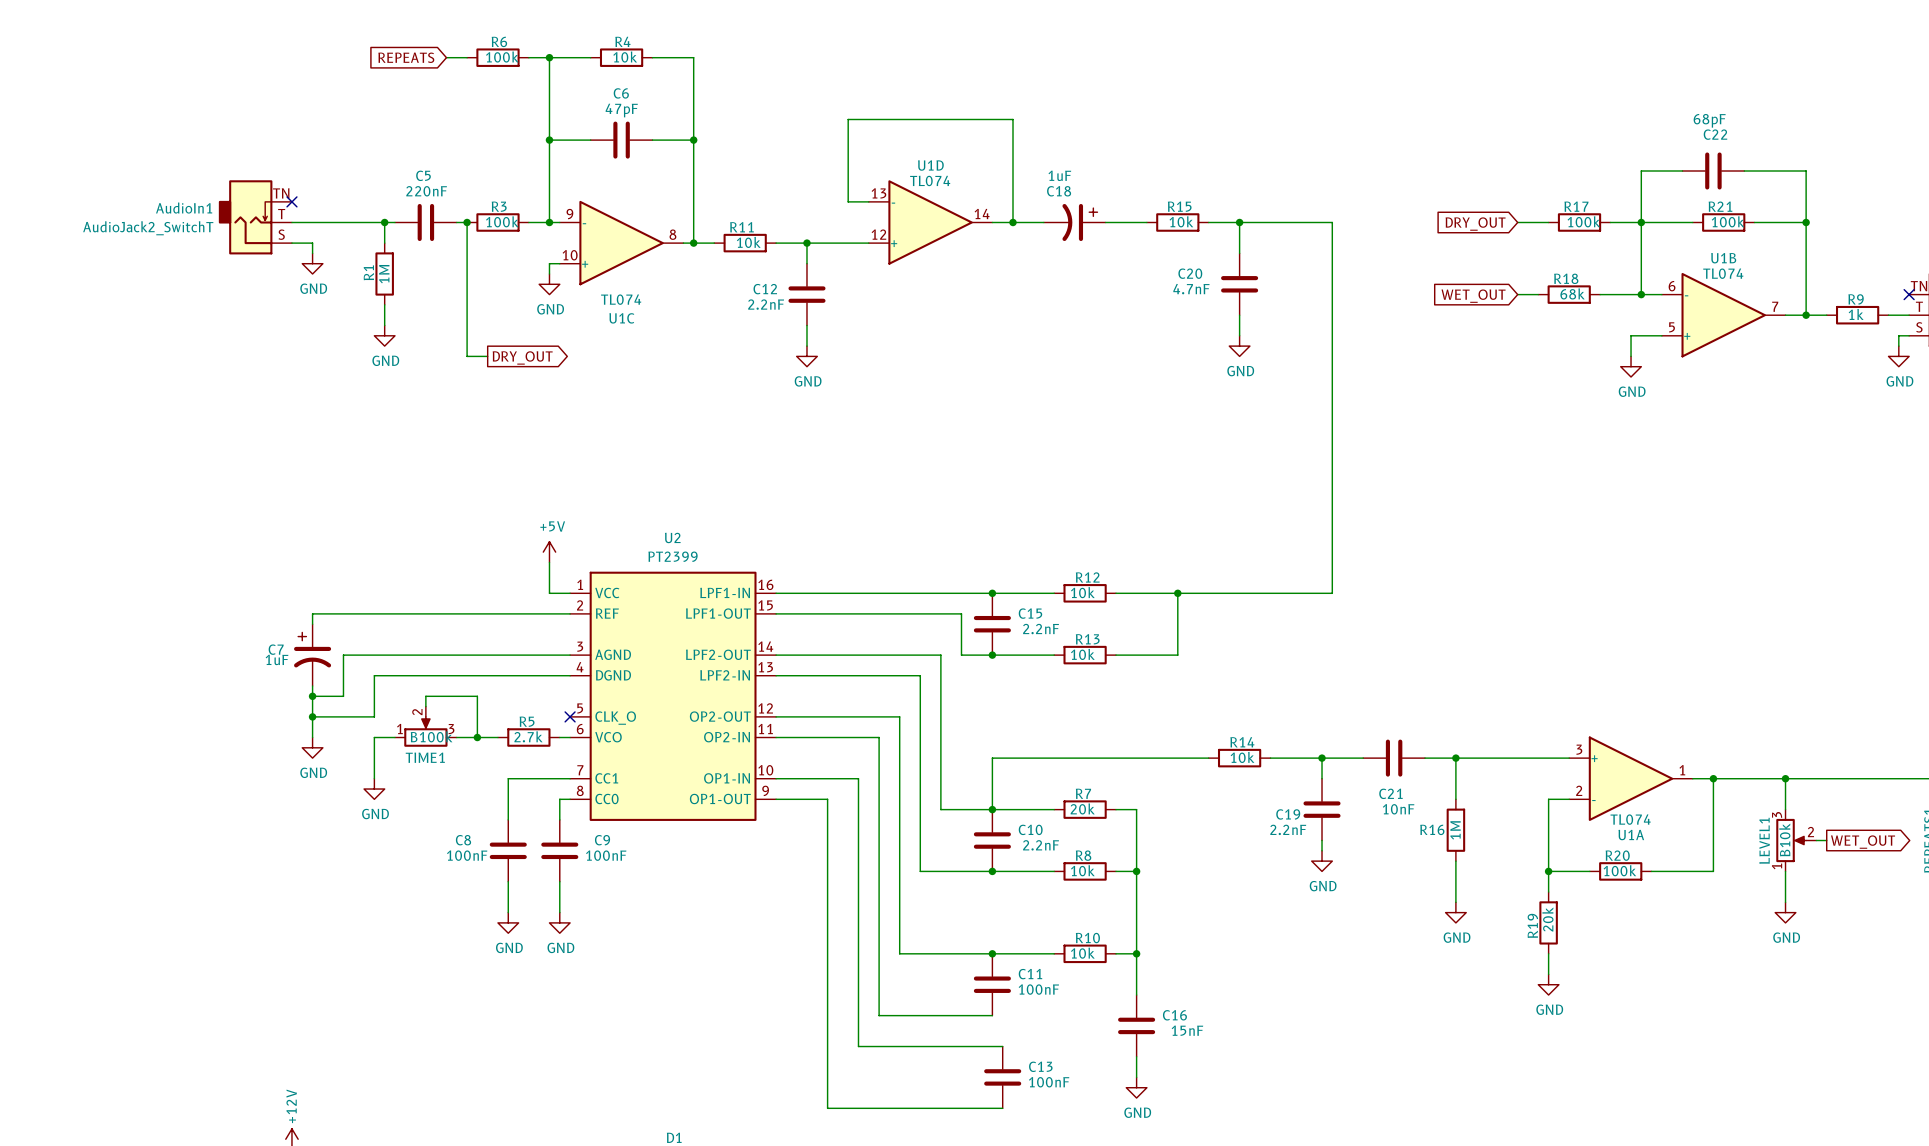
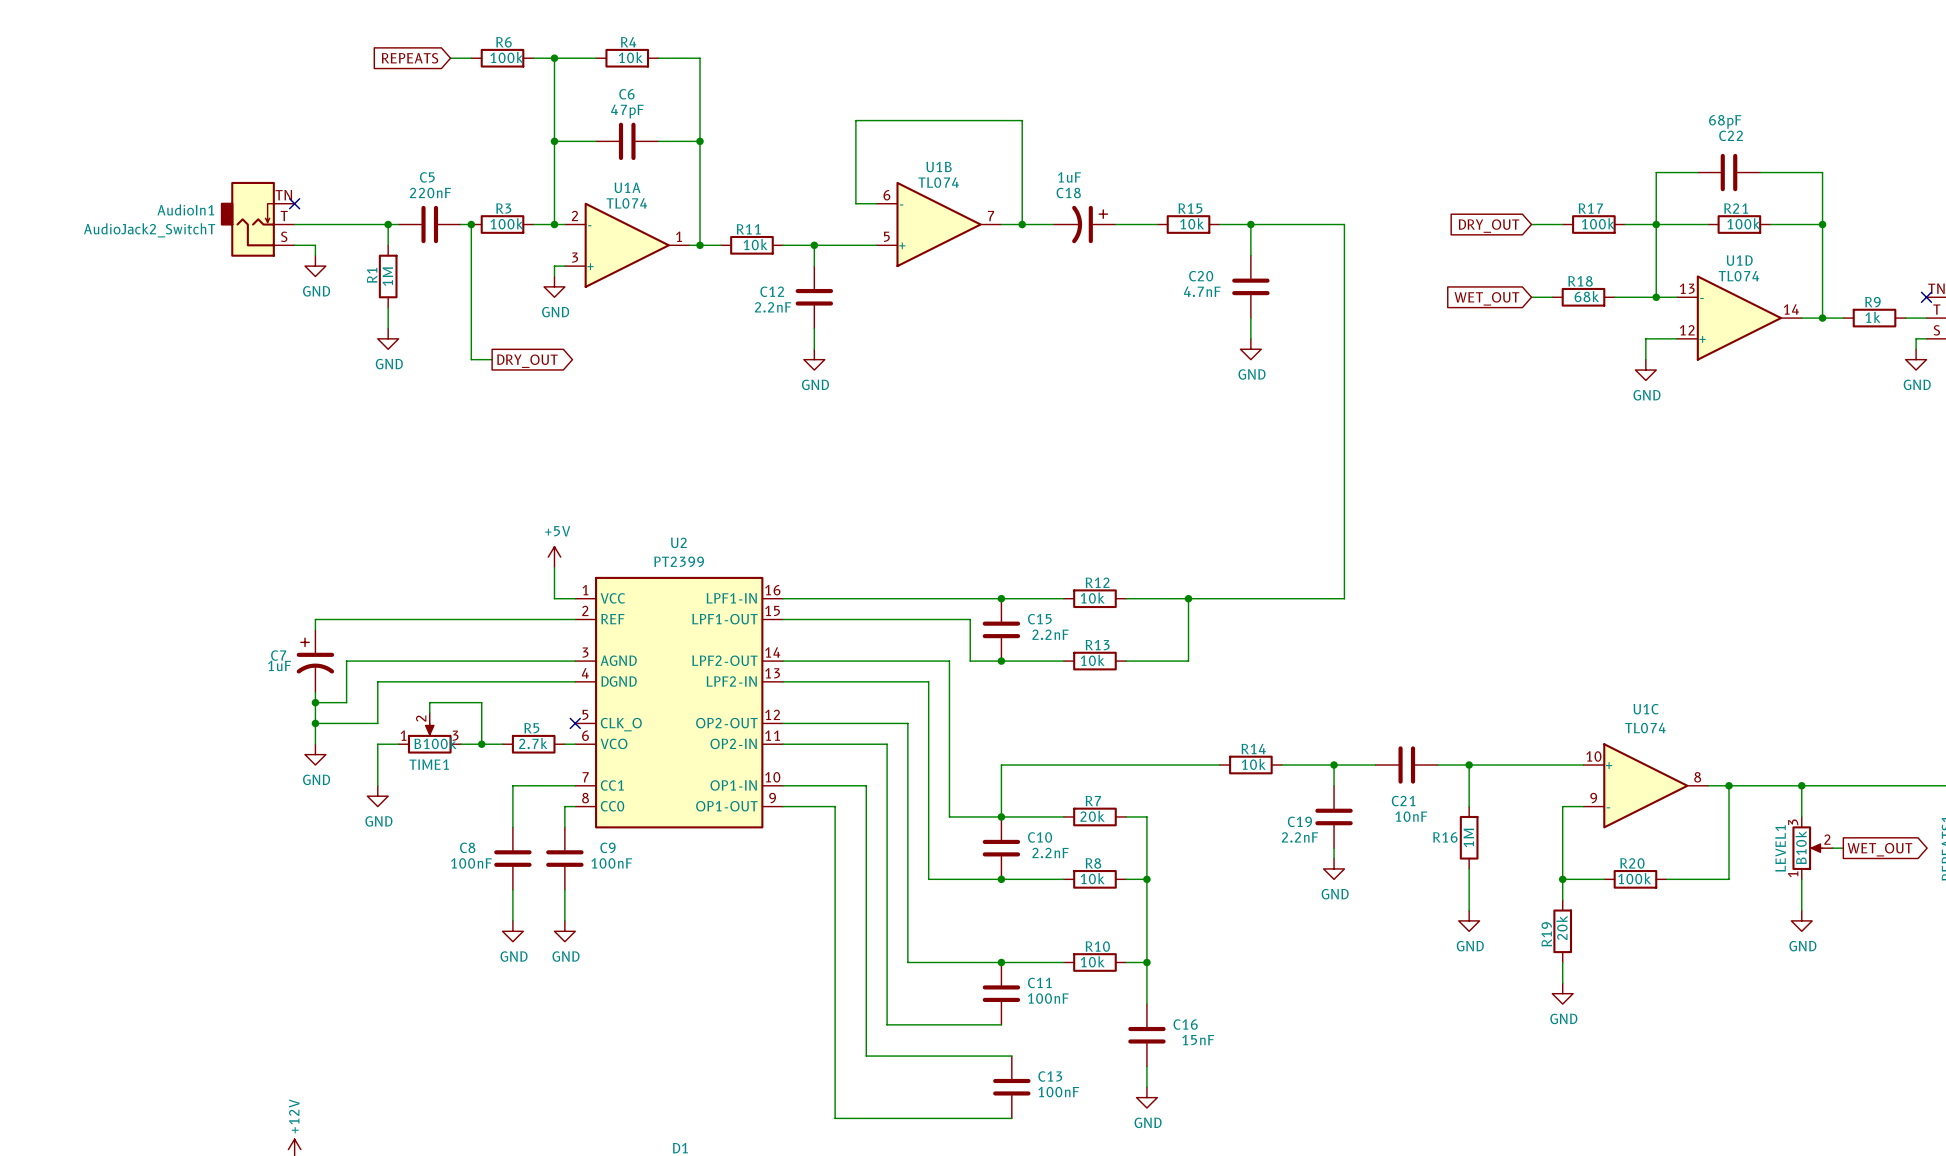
U1D position: (930, 222) -> (1739, 318)
U1C flip: as is (621, 243) -> up-down (1645, 785)
U1C position: (621, 243) -> (1645, 785)
U1B position: (1723, 315) -> (939, 224)
U1A flip: as is (1631, 778) -> up-down (627, 245)
U1A position: (1631, 778) -> (627, 245)

